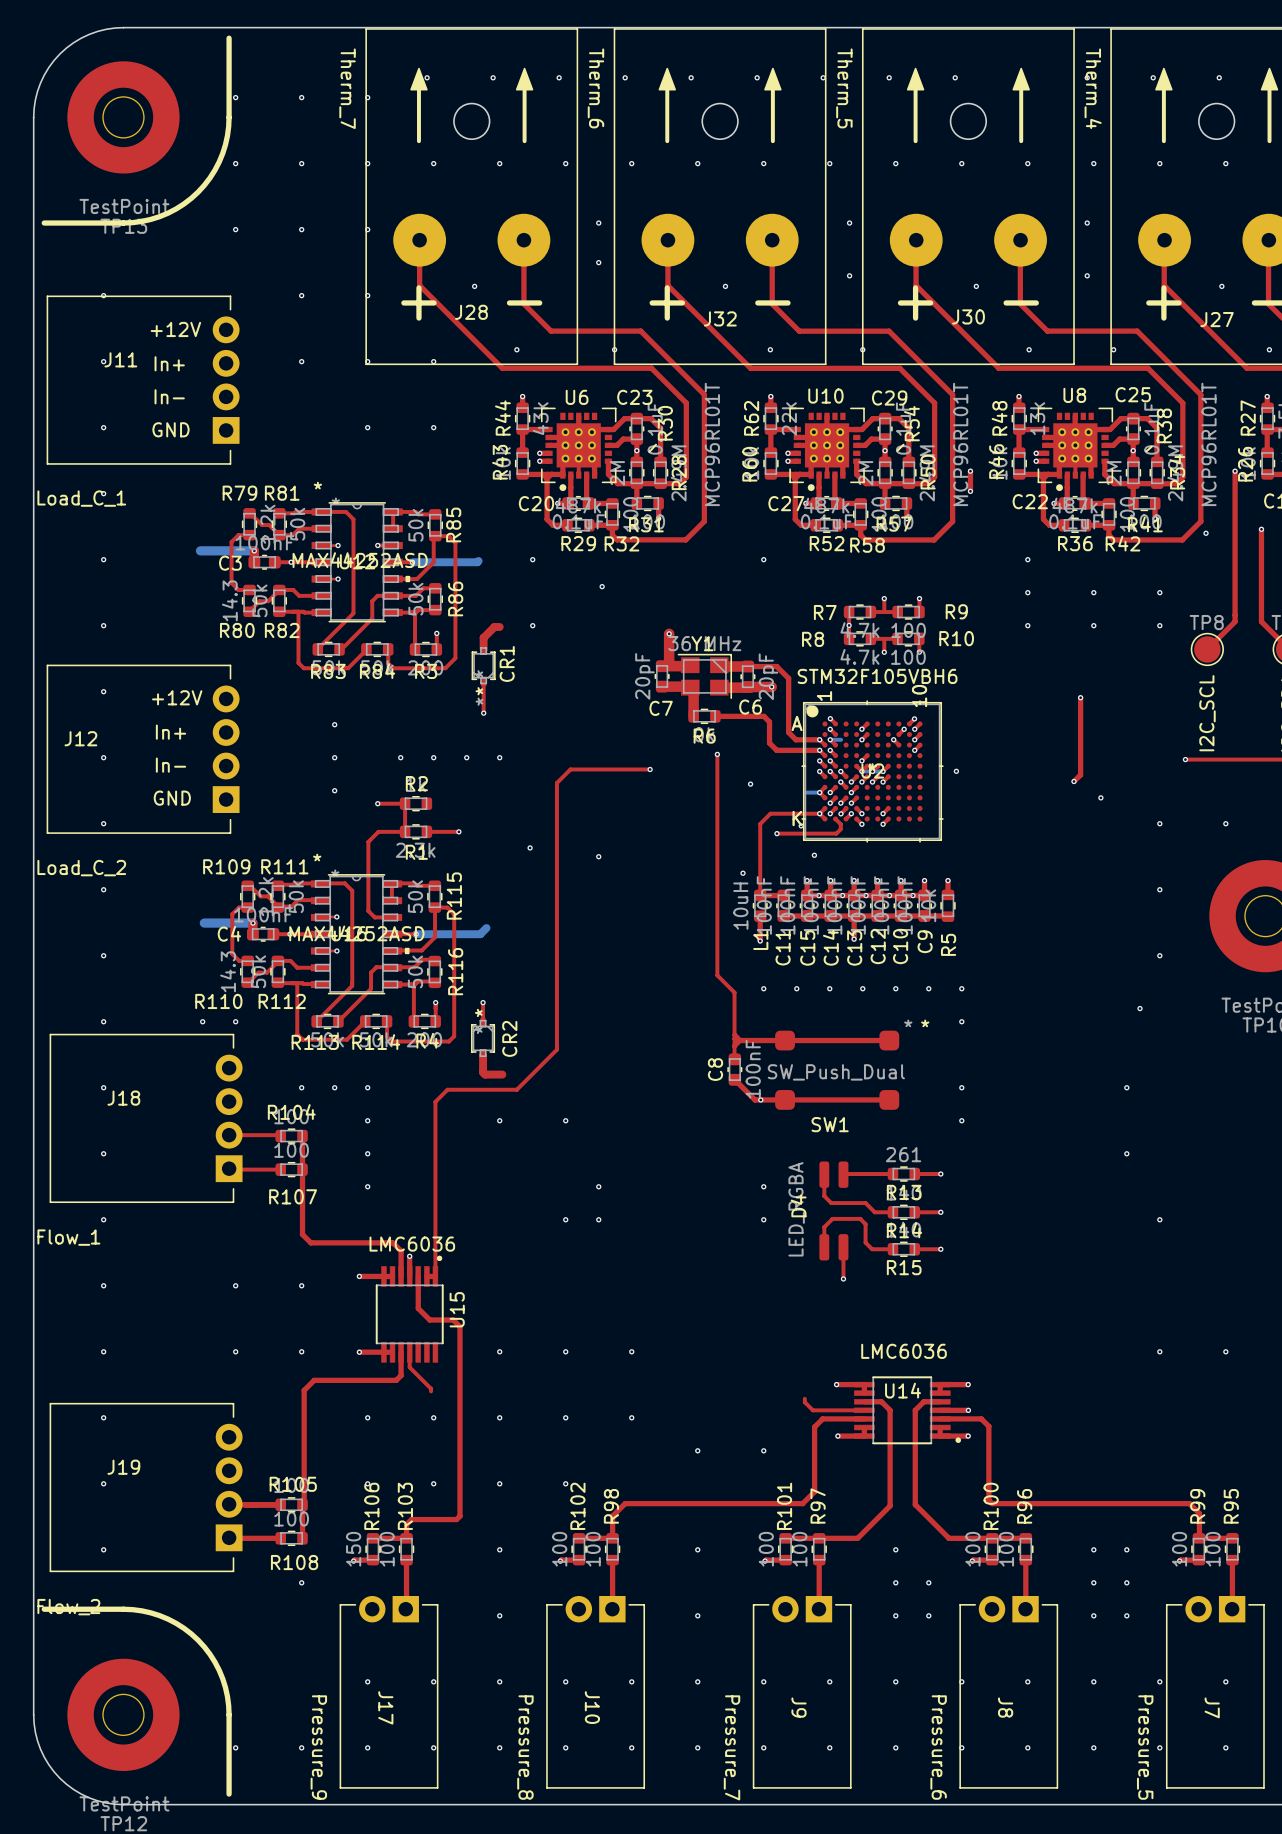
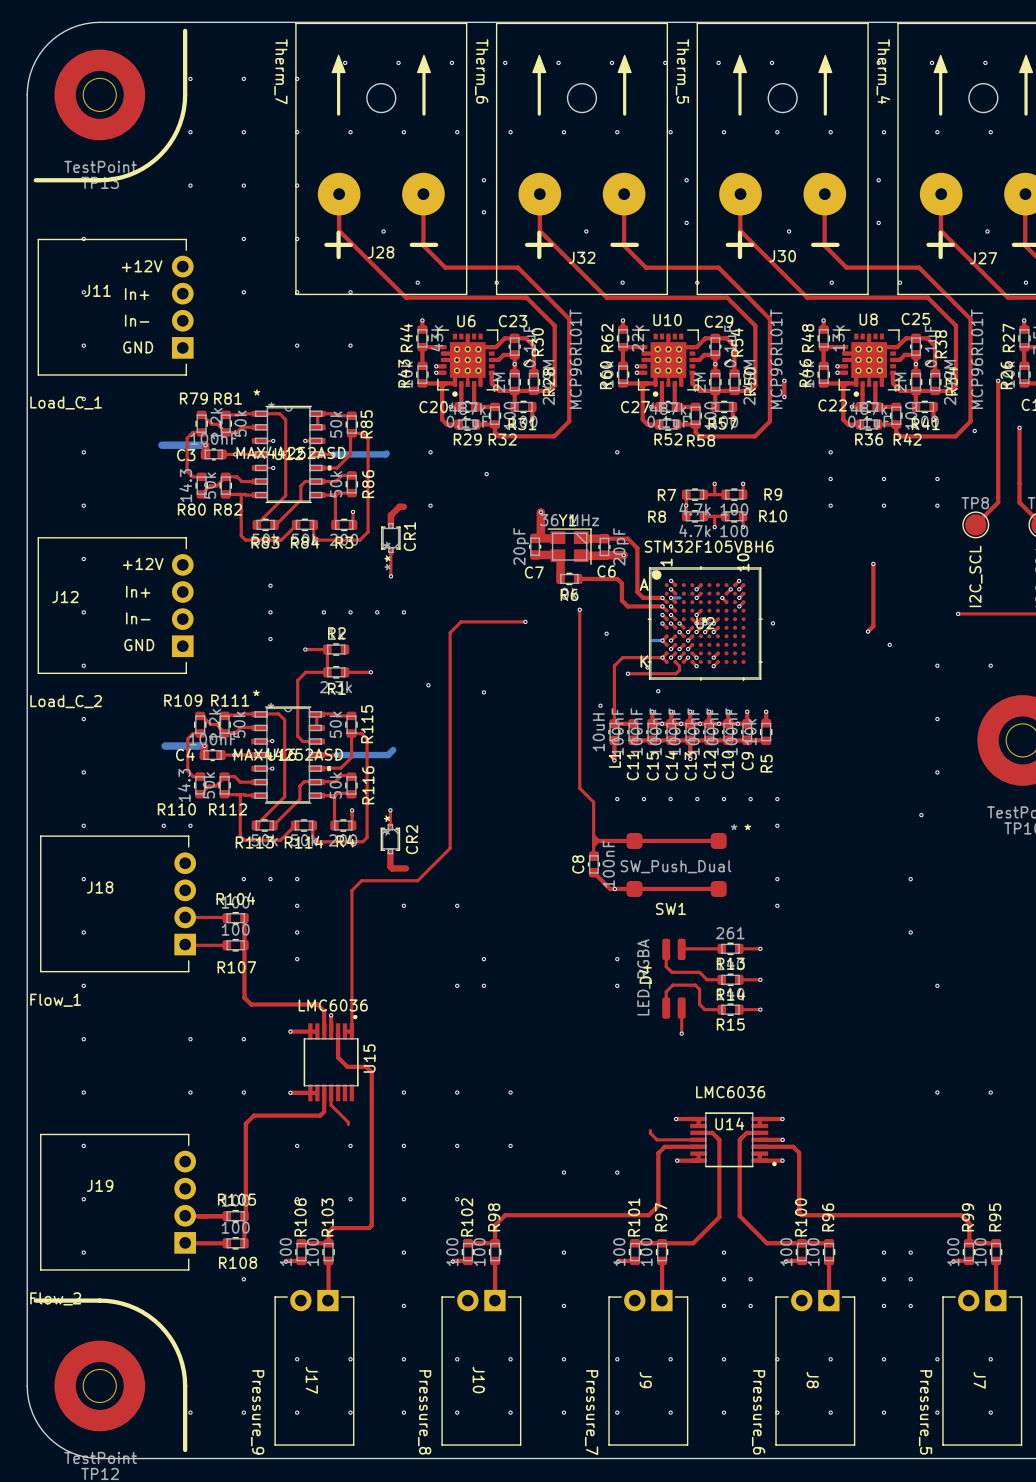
R106 value: 150 (353, 1549) -> 100 (285, 1252)

